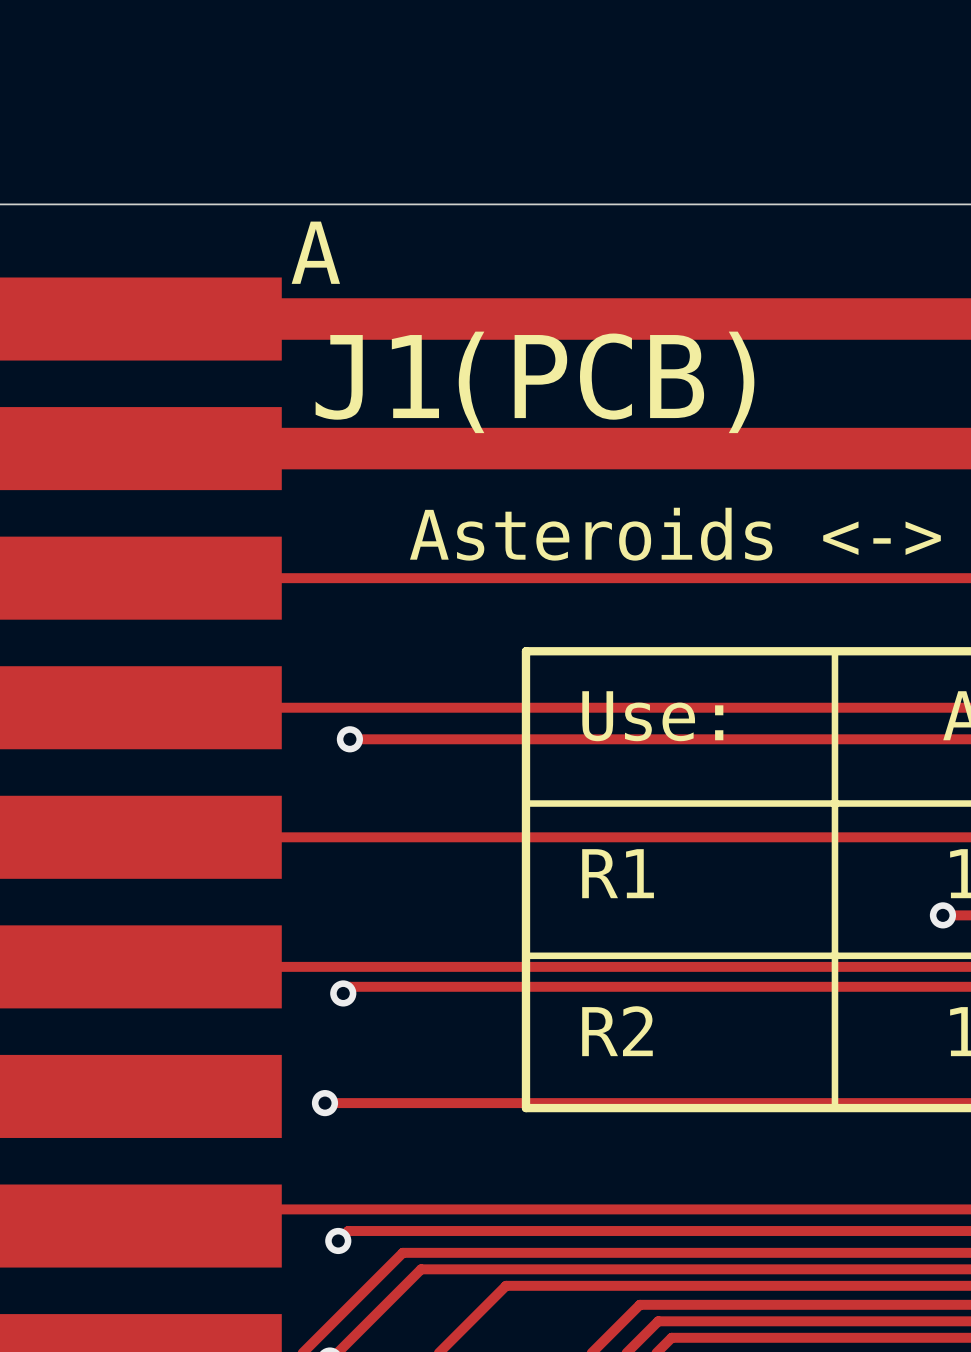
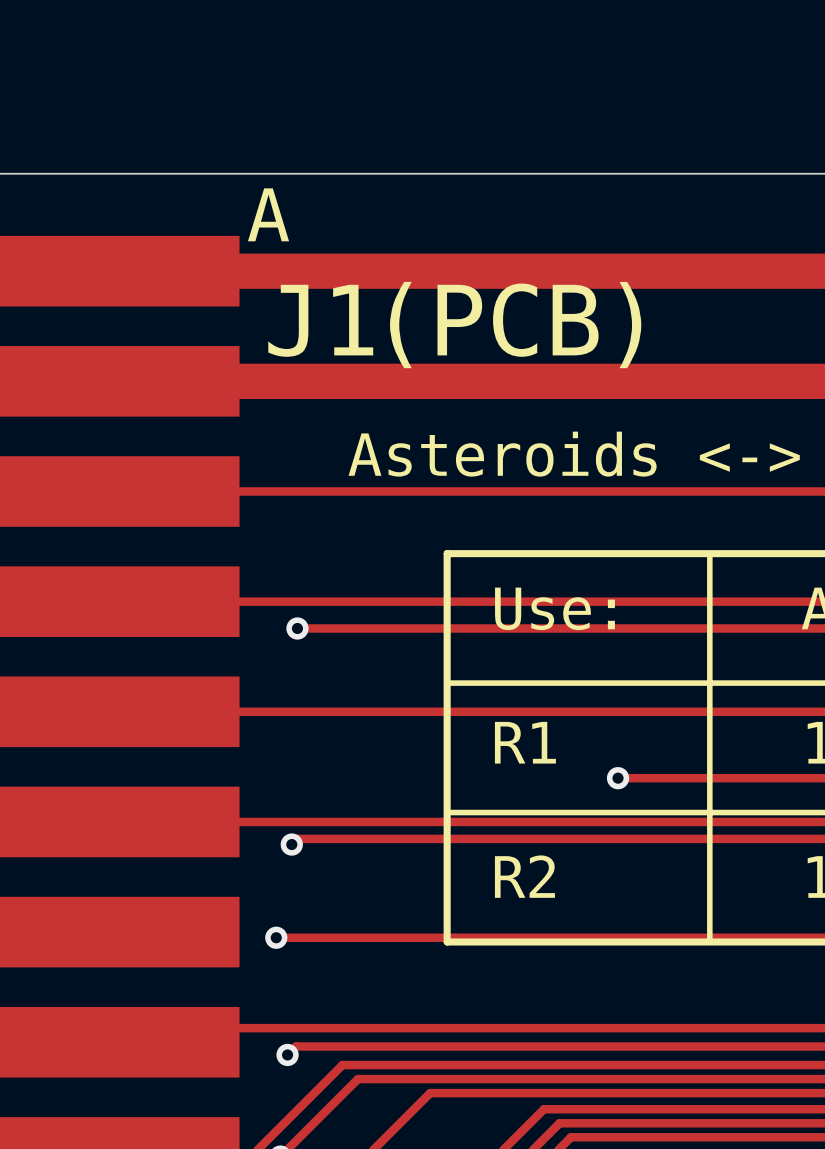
track: none -> (618, 778) (801, 778)
via: none -> (618, 778)
via: (942, 915) -> none

